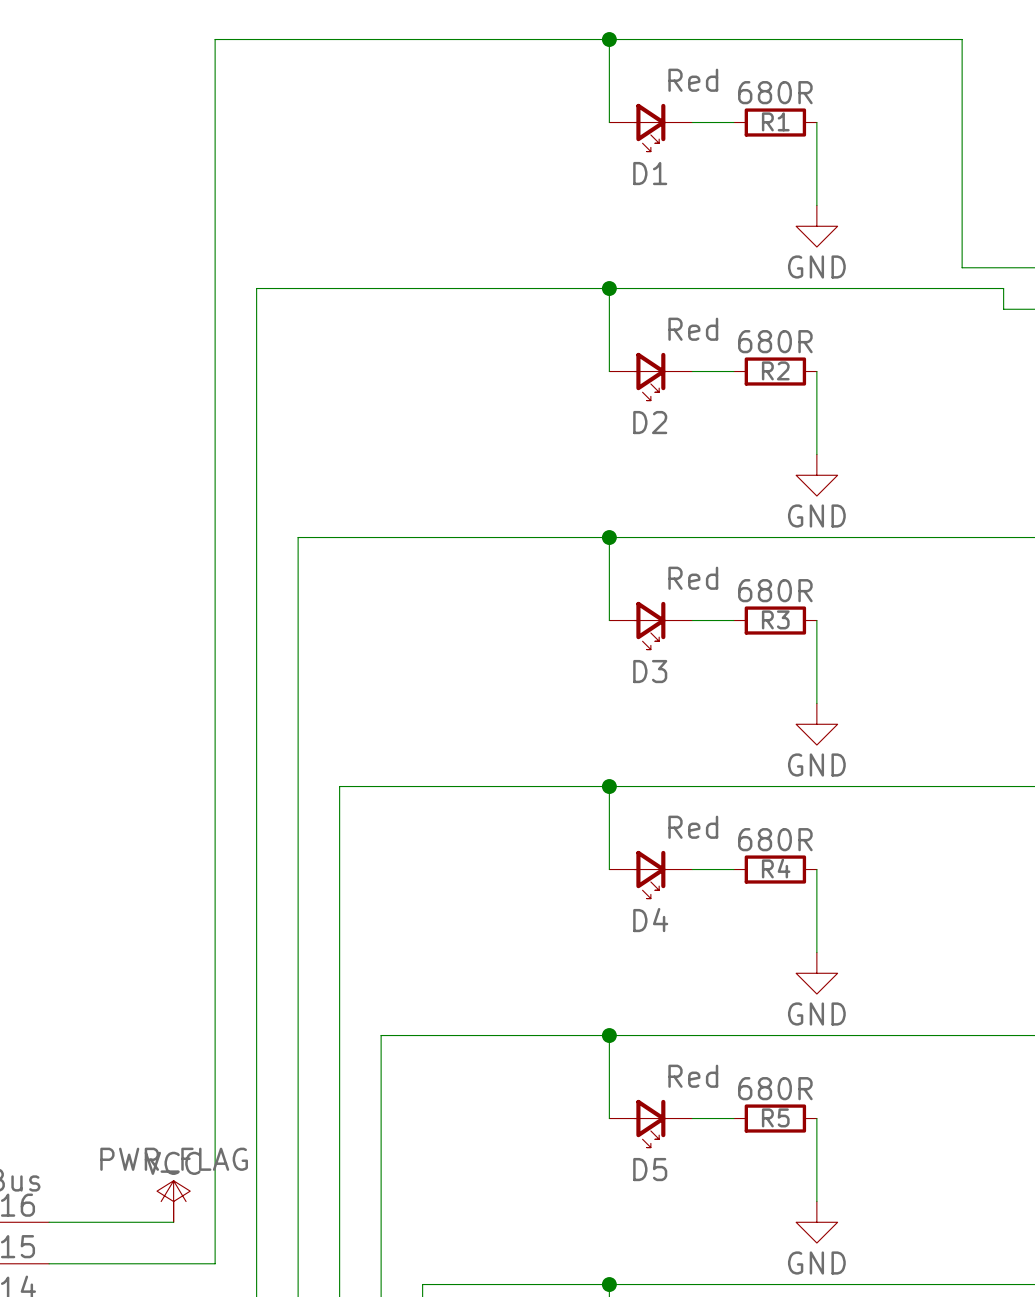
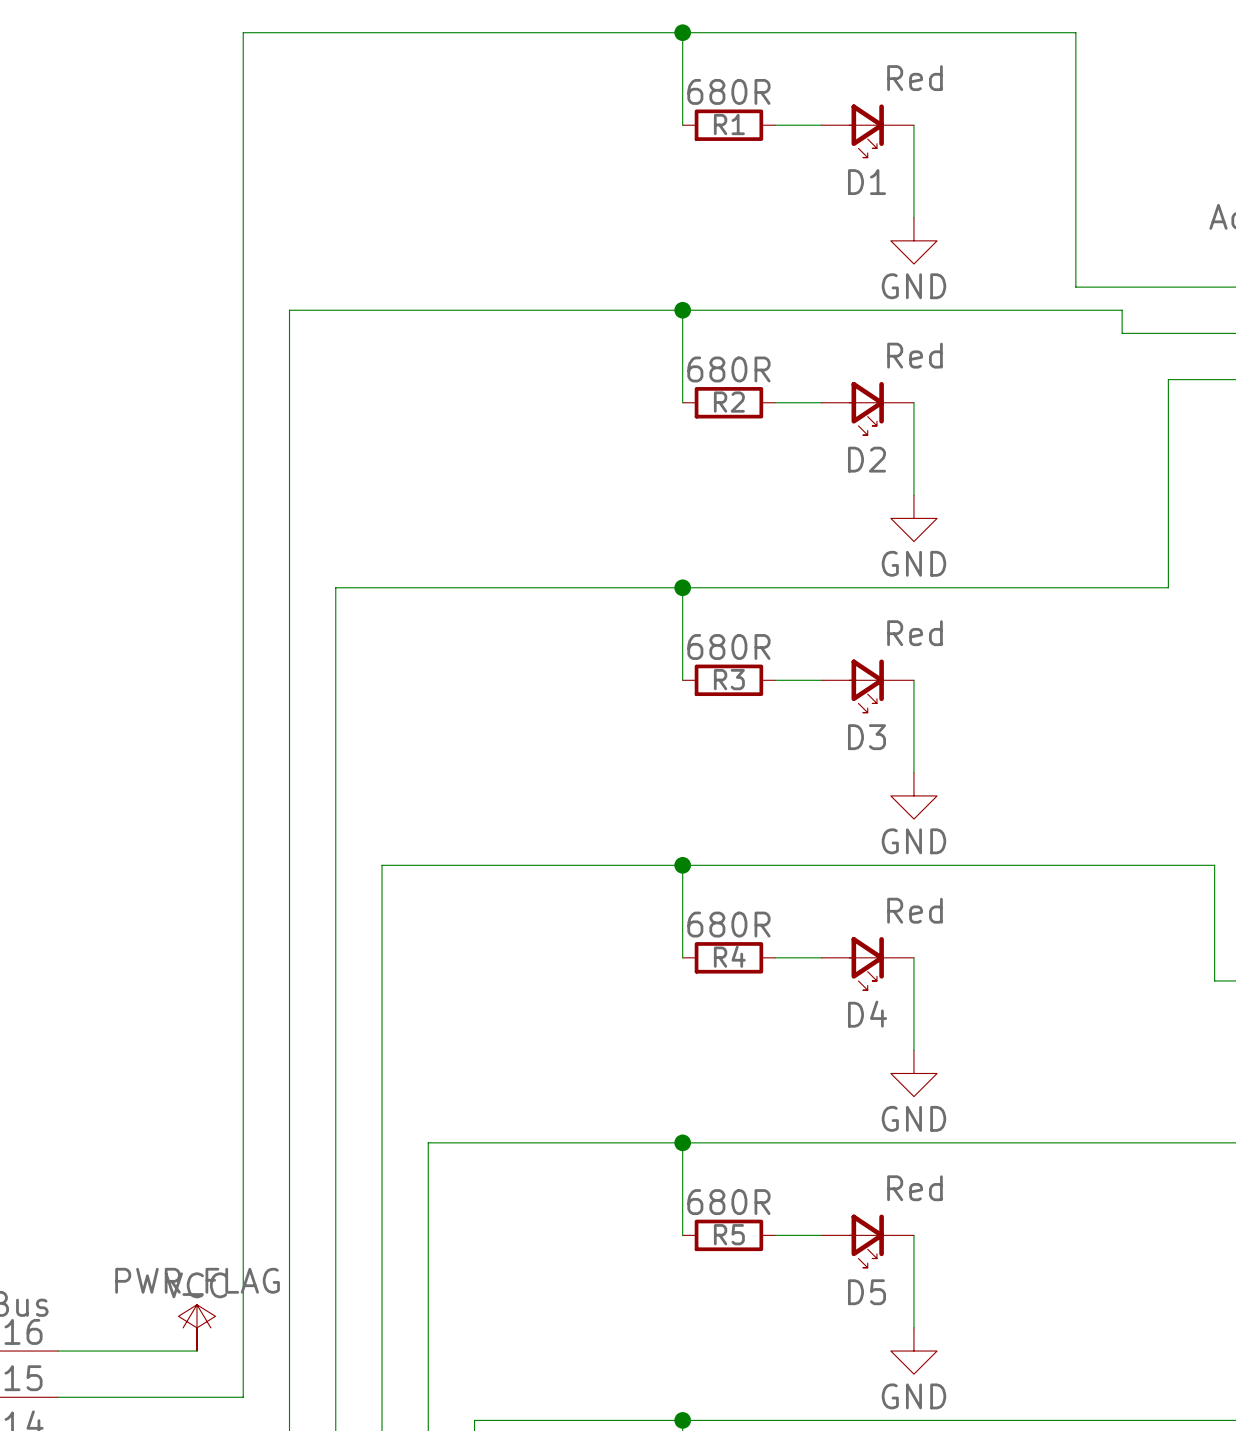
R1 position: (775, 122) -> (728, 125)
D1 position: (650, 127) -> (867, 131)
R2 position: (775, 371) -> (728, 402)
D2 position: (650, 376) -> (867, 408)
R3 position: (775, 620) -> (728, 680)
D3 position: (650, 625) -> (867, 686)
R4 position: (775, 869) -> (728, 957)
D4 position: (650, 874) -> (867, 963)
R5 position: (775, 1118) -> (728, 1235)
D5 position: (650, 1123) -> (867, 1241)

